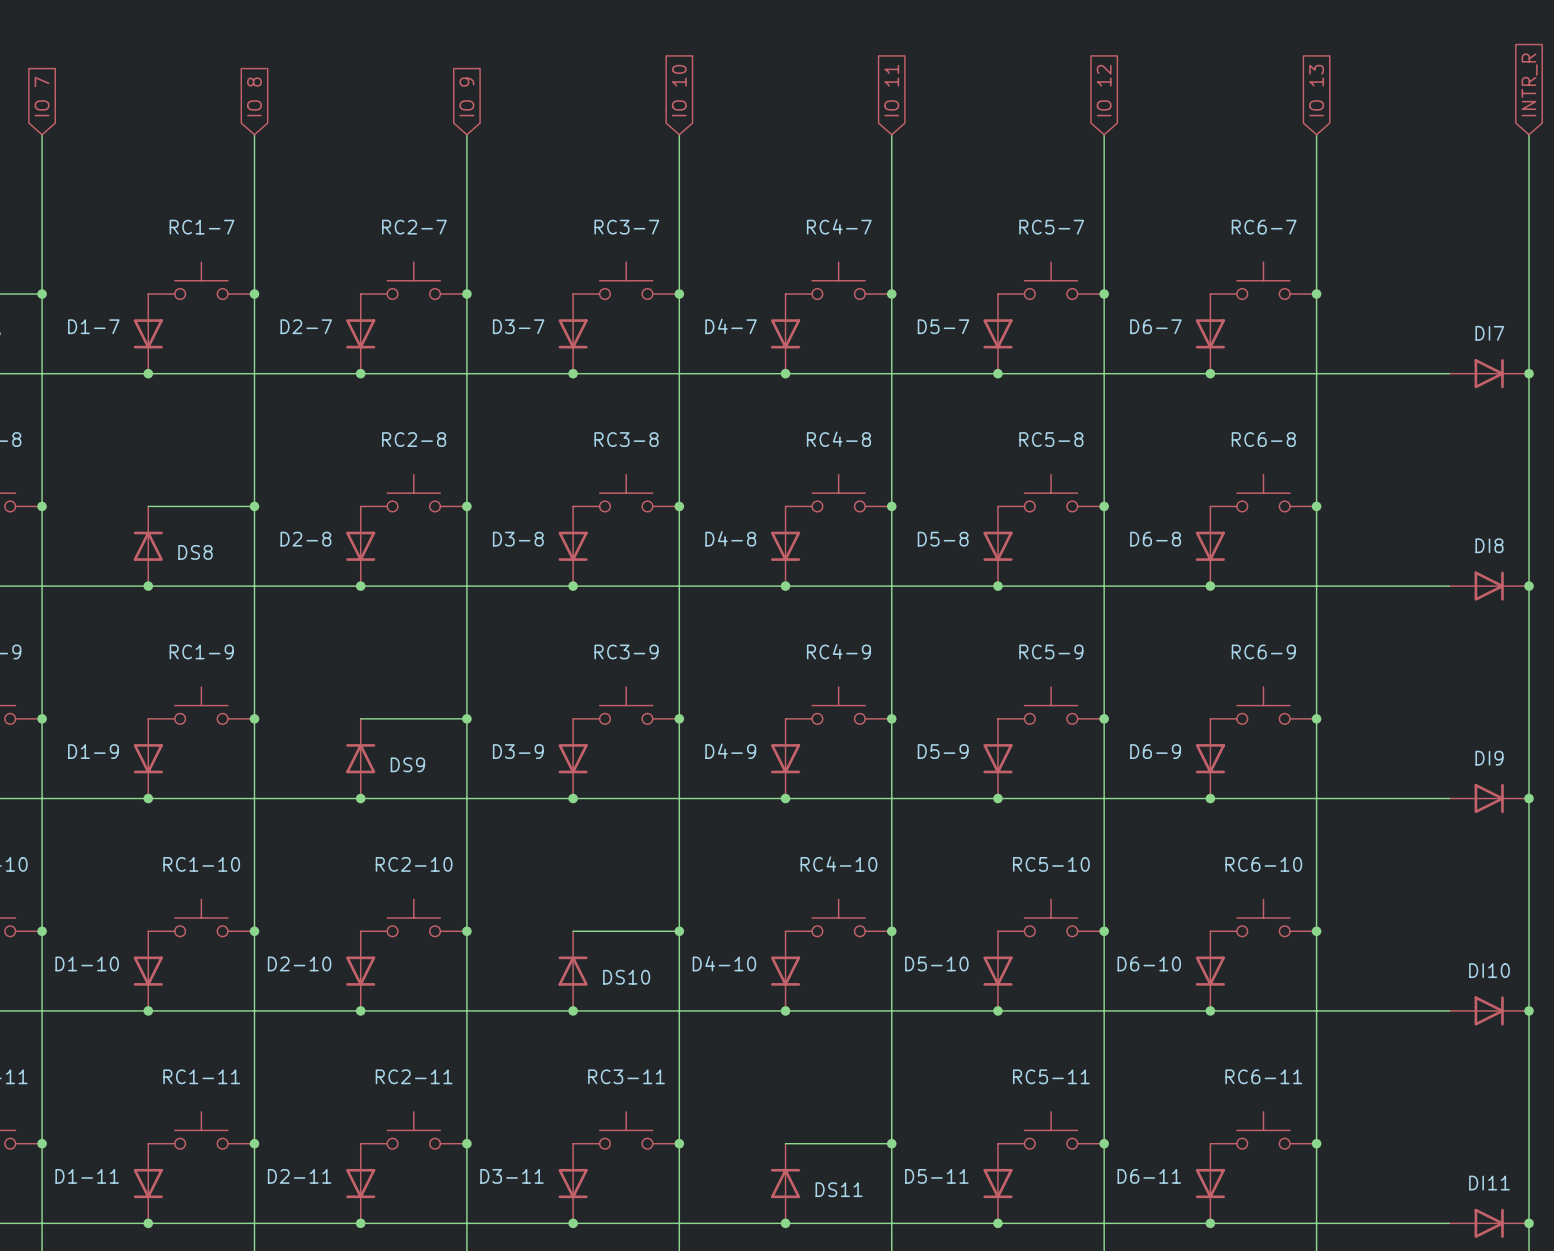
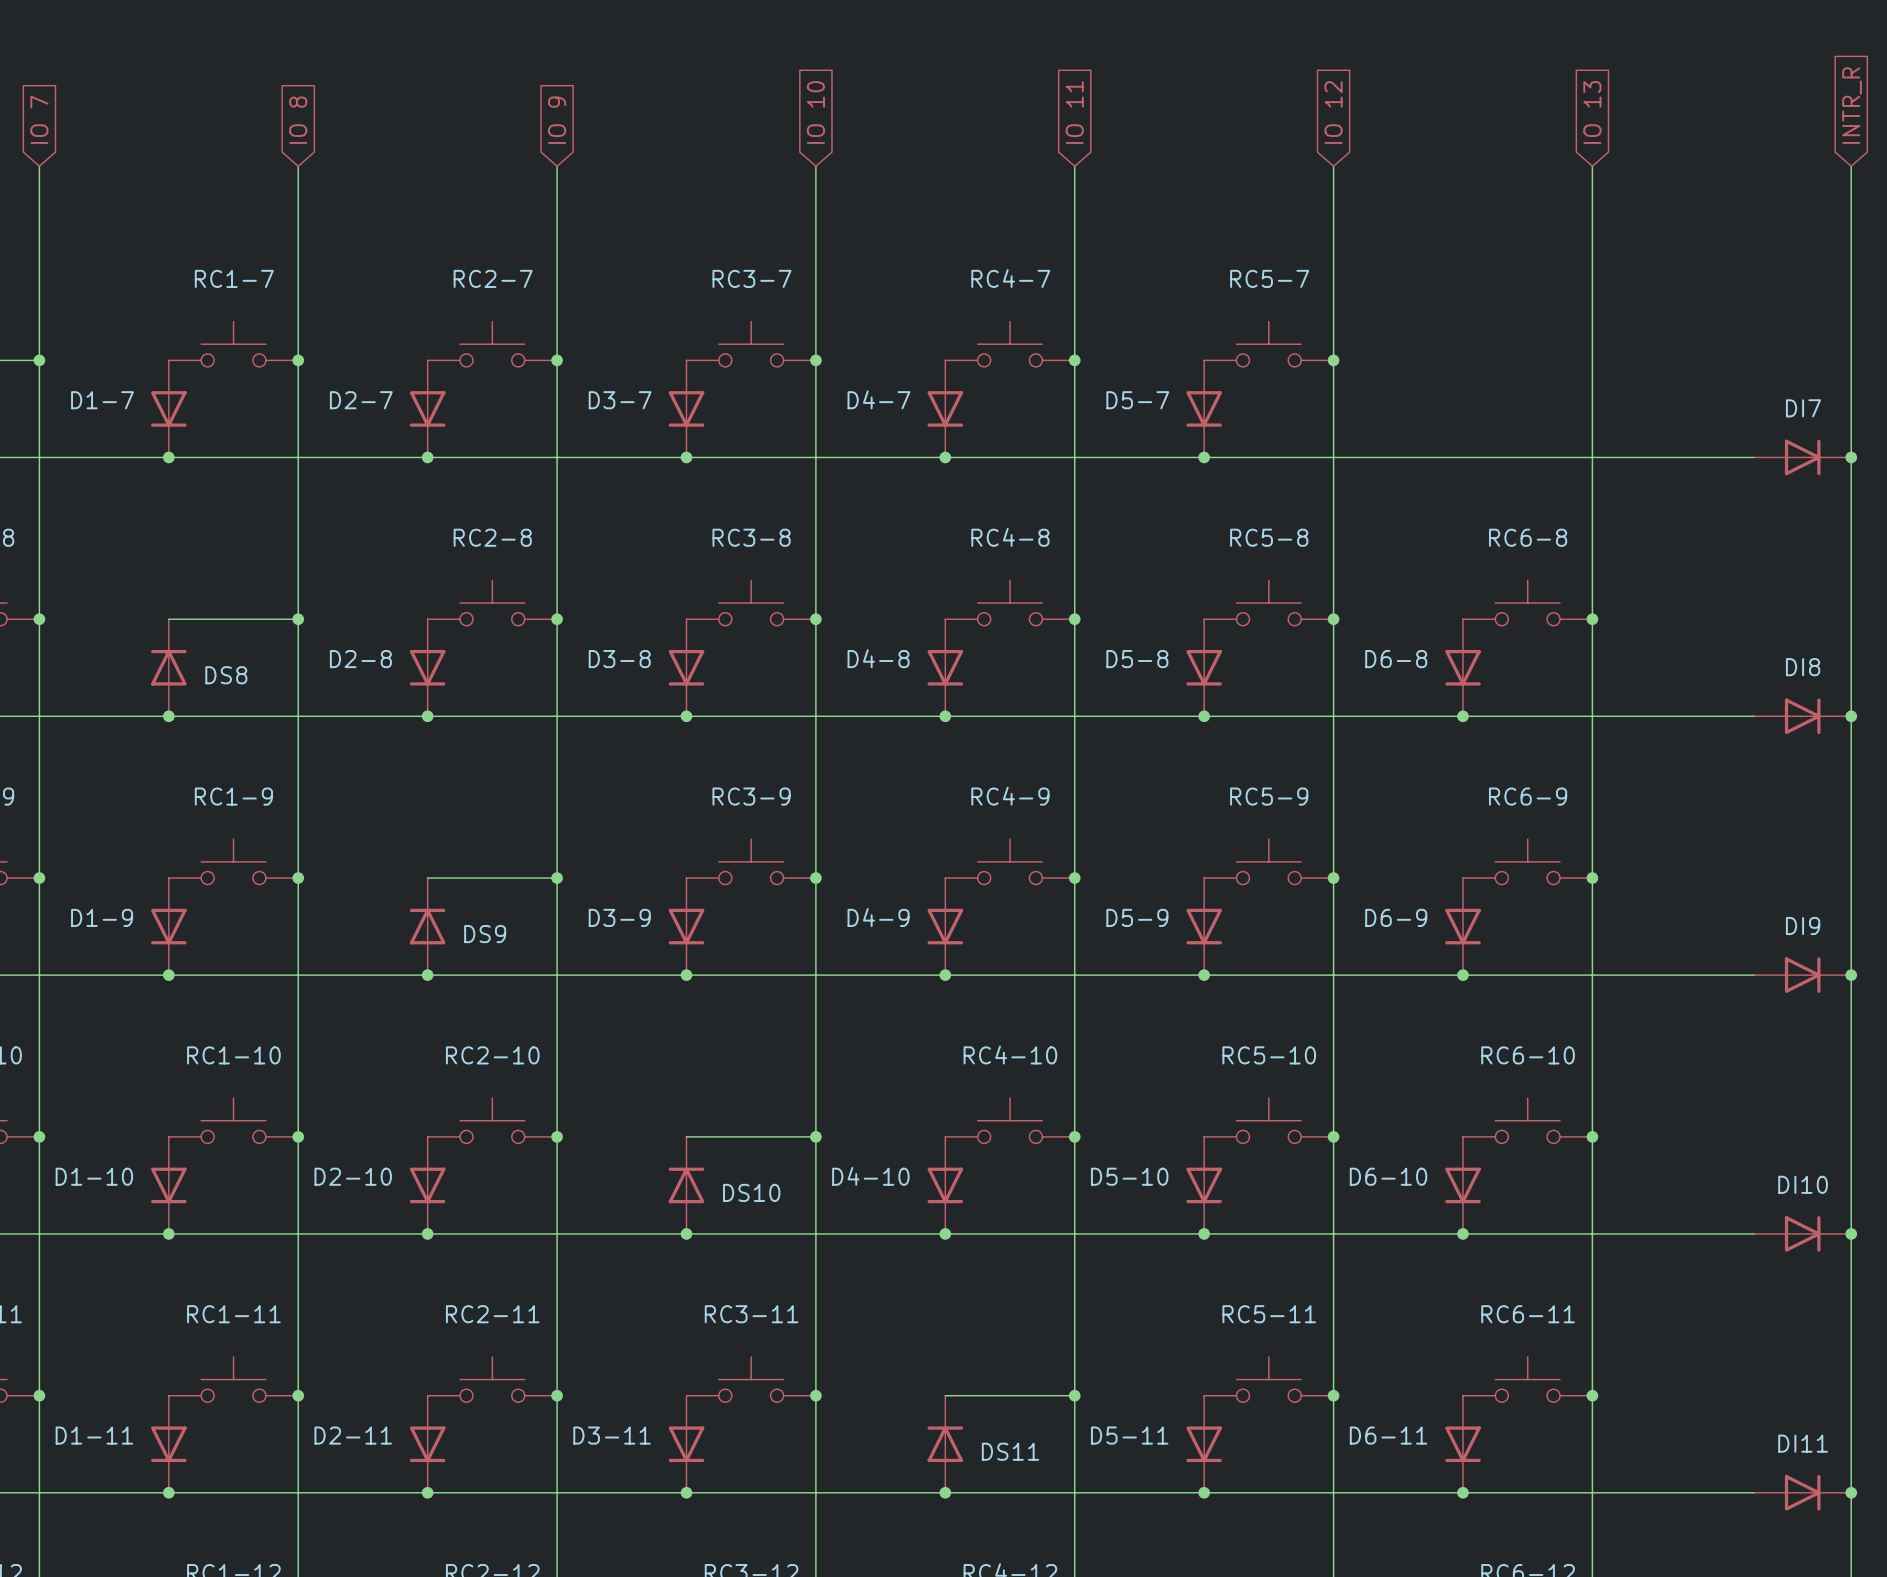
RC6-7: (1263, 280) -> none
junction: (1316, 294) -> none
D6-7: (1210, 333) -> none
junction: (1210, 373) -> none

